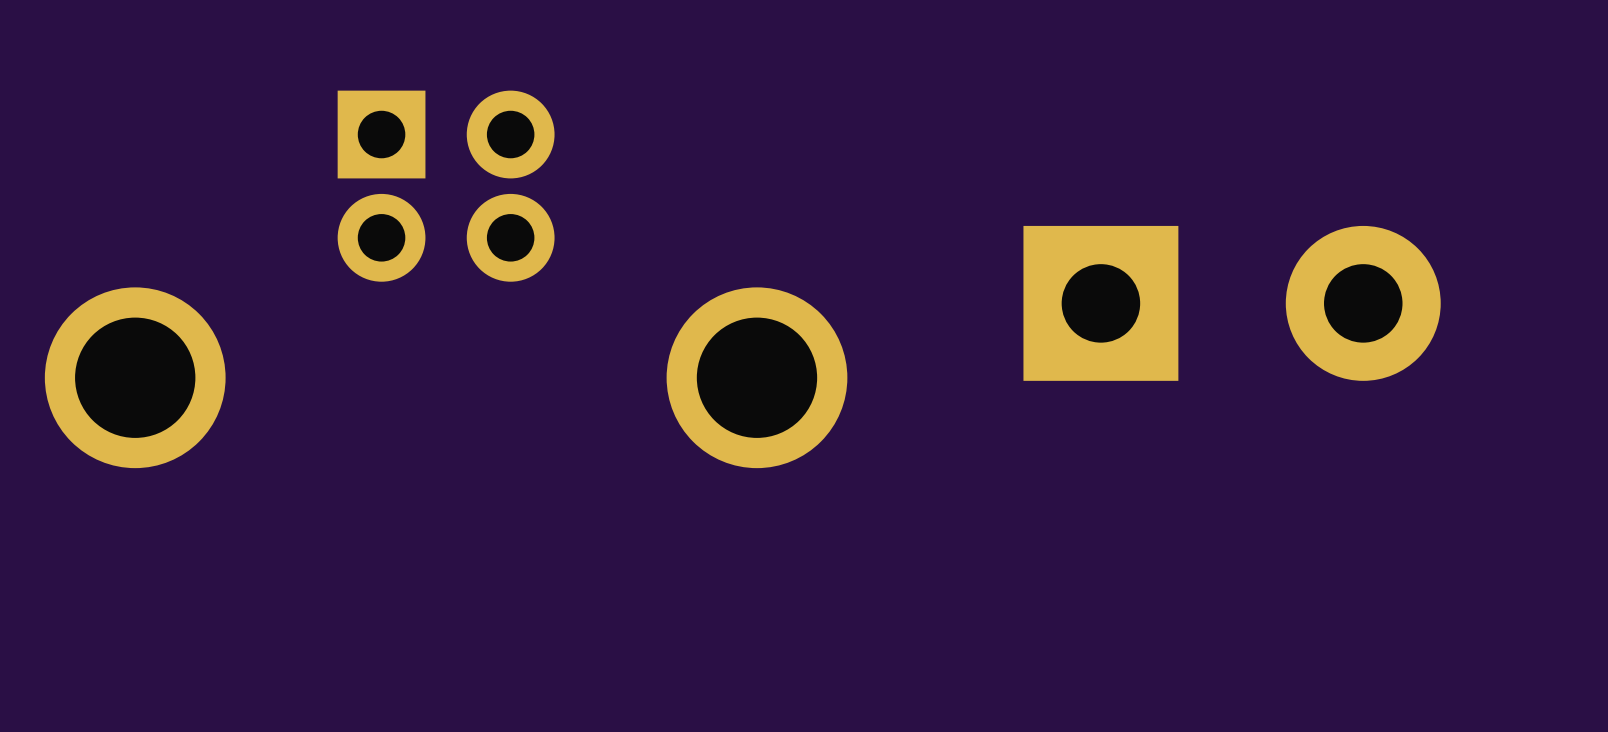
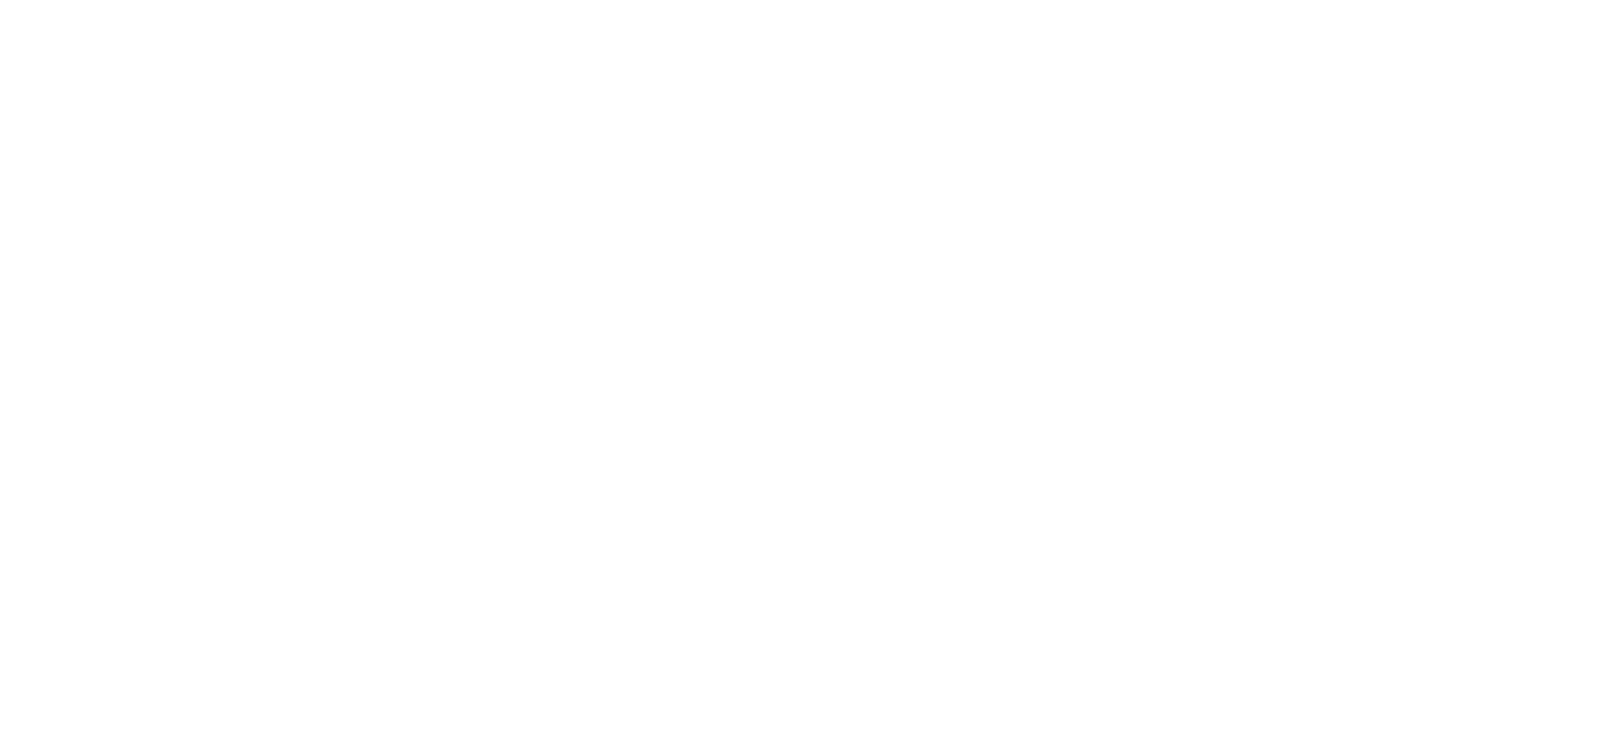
part: (446, 279) -> none
part: (1232, 303) -> none

